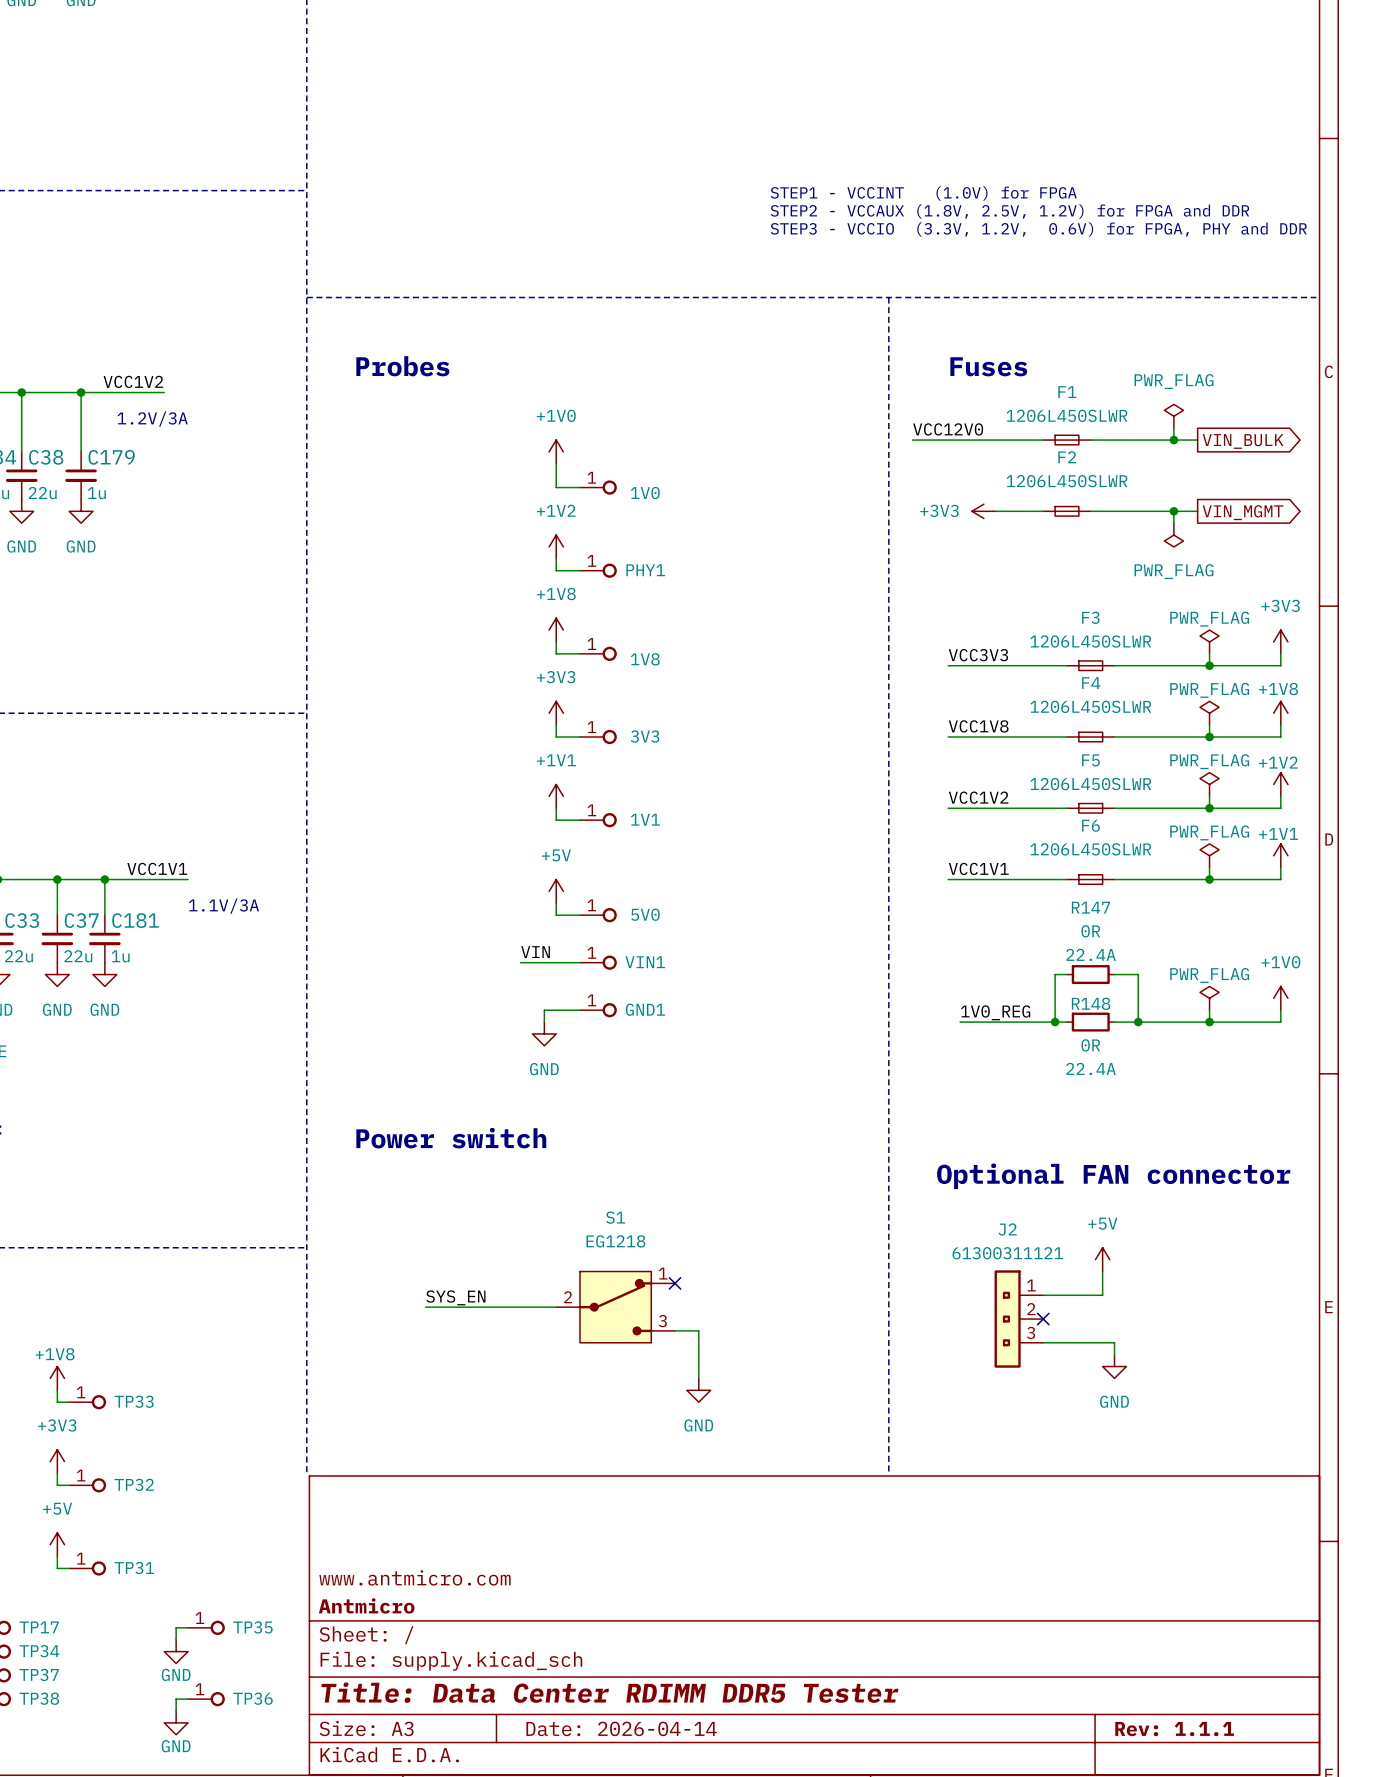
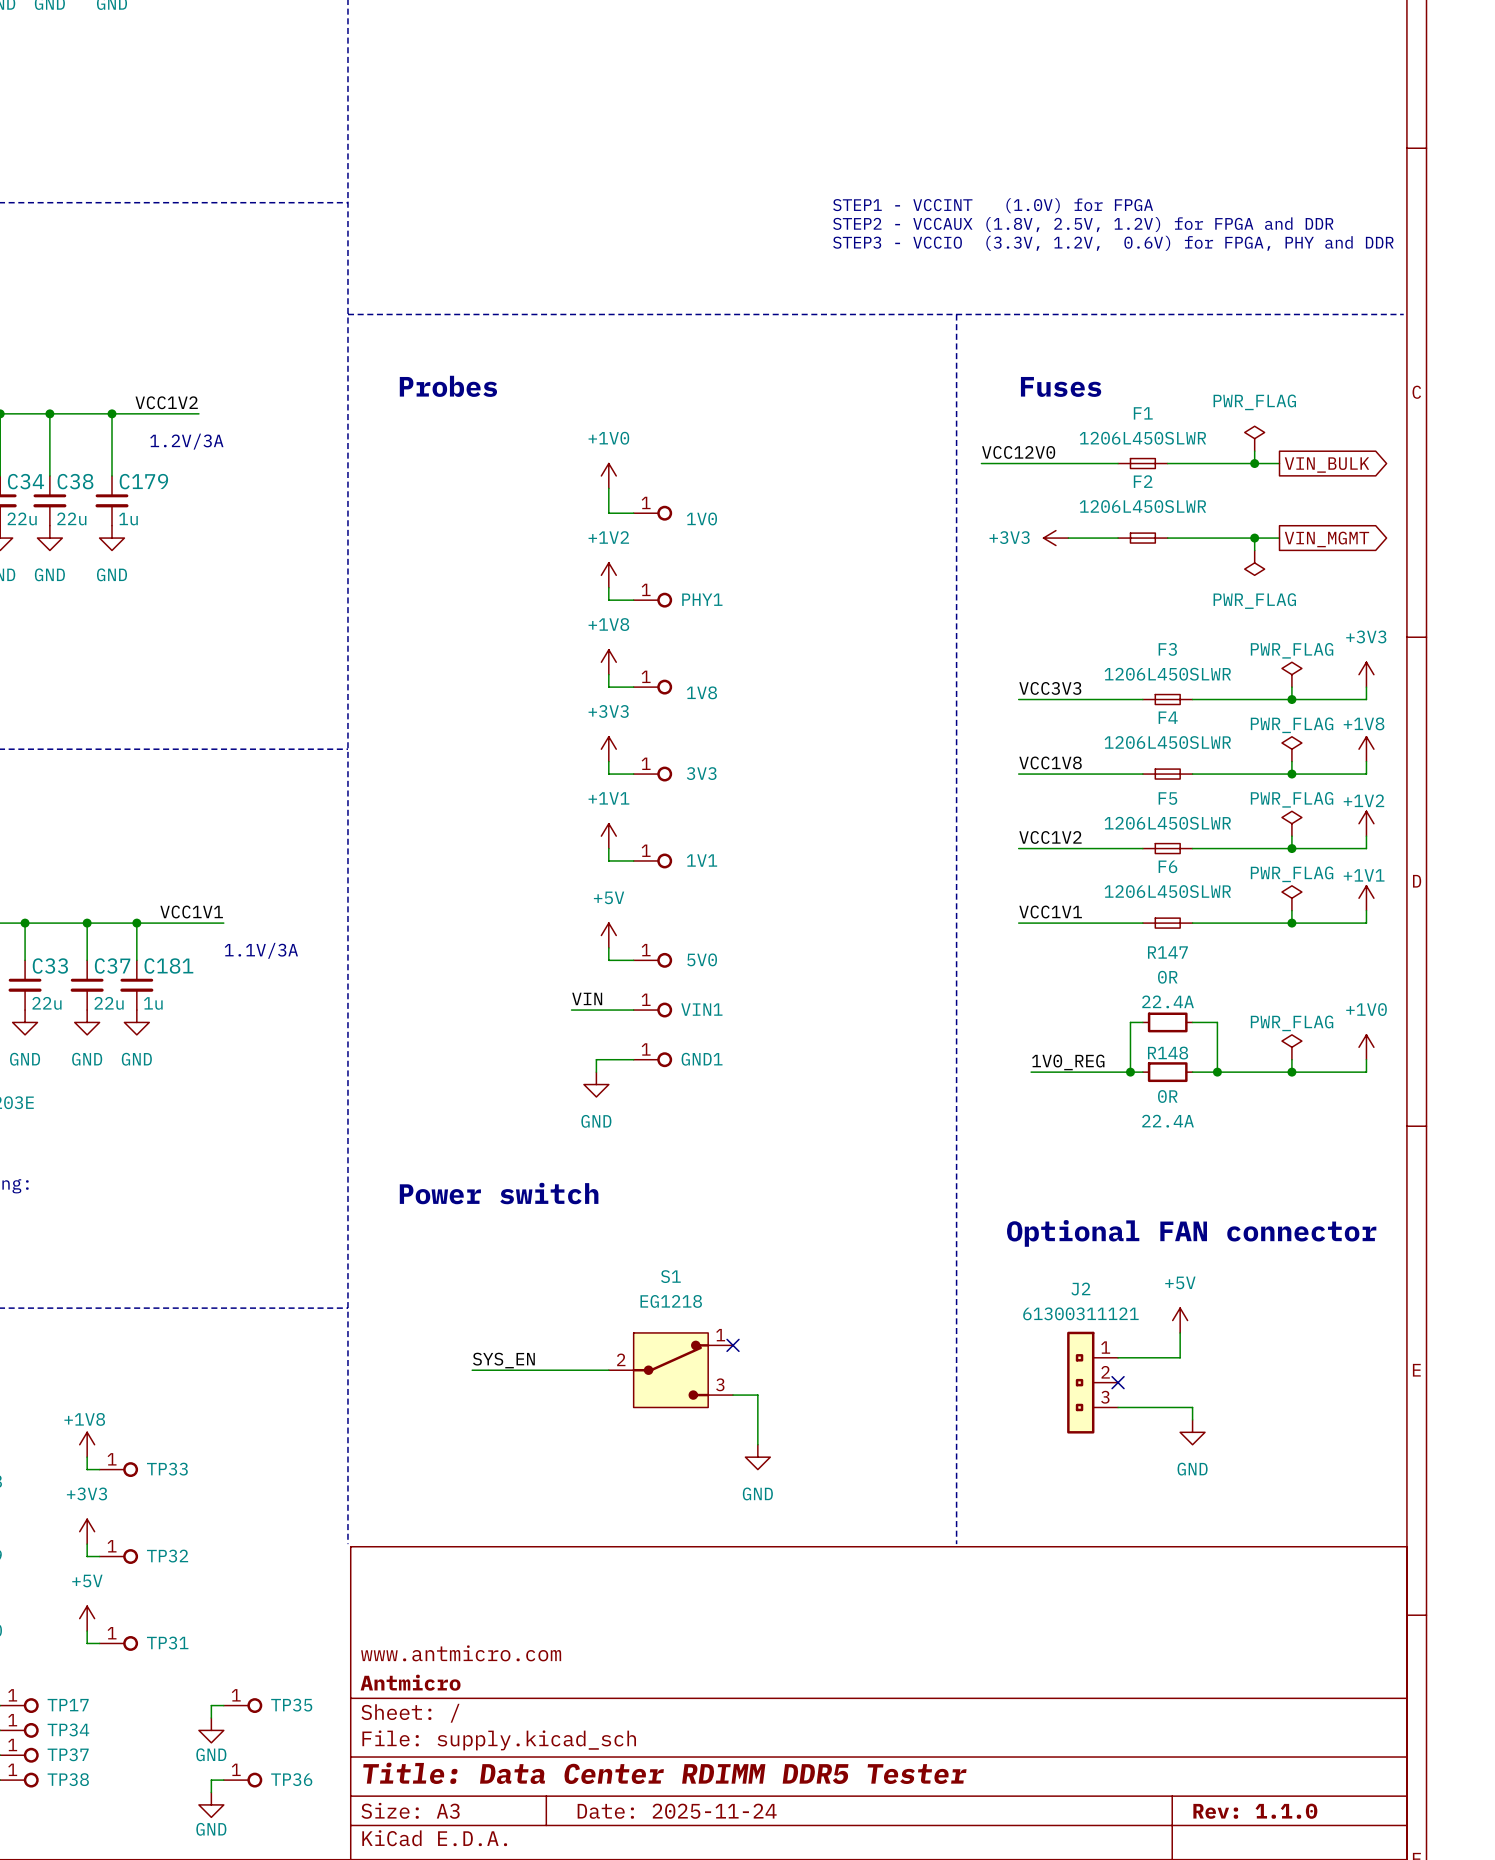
title block: Date: 2026-04-14 (621, 1728) -> Date: 2025-11-24 (677, 1811)
title block: Rev: 1.1.1 (1174, 1729) -> Rev: 1.1.0 (1255, 1811)

